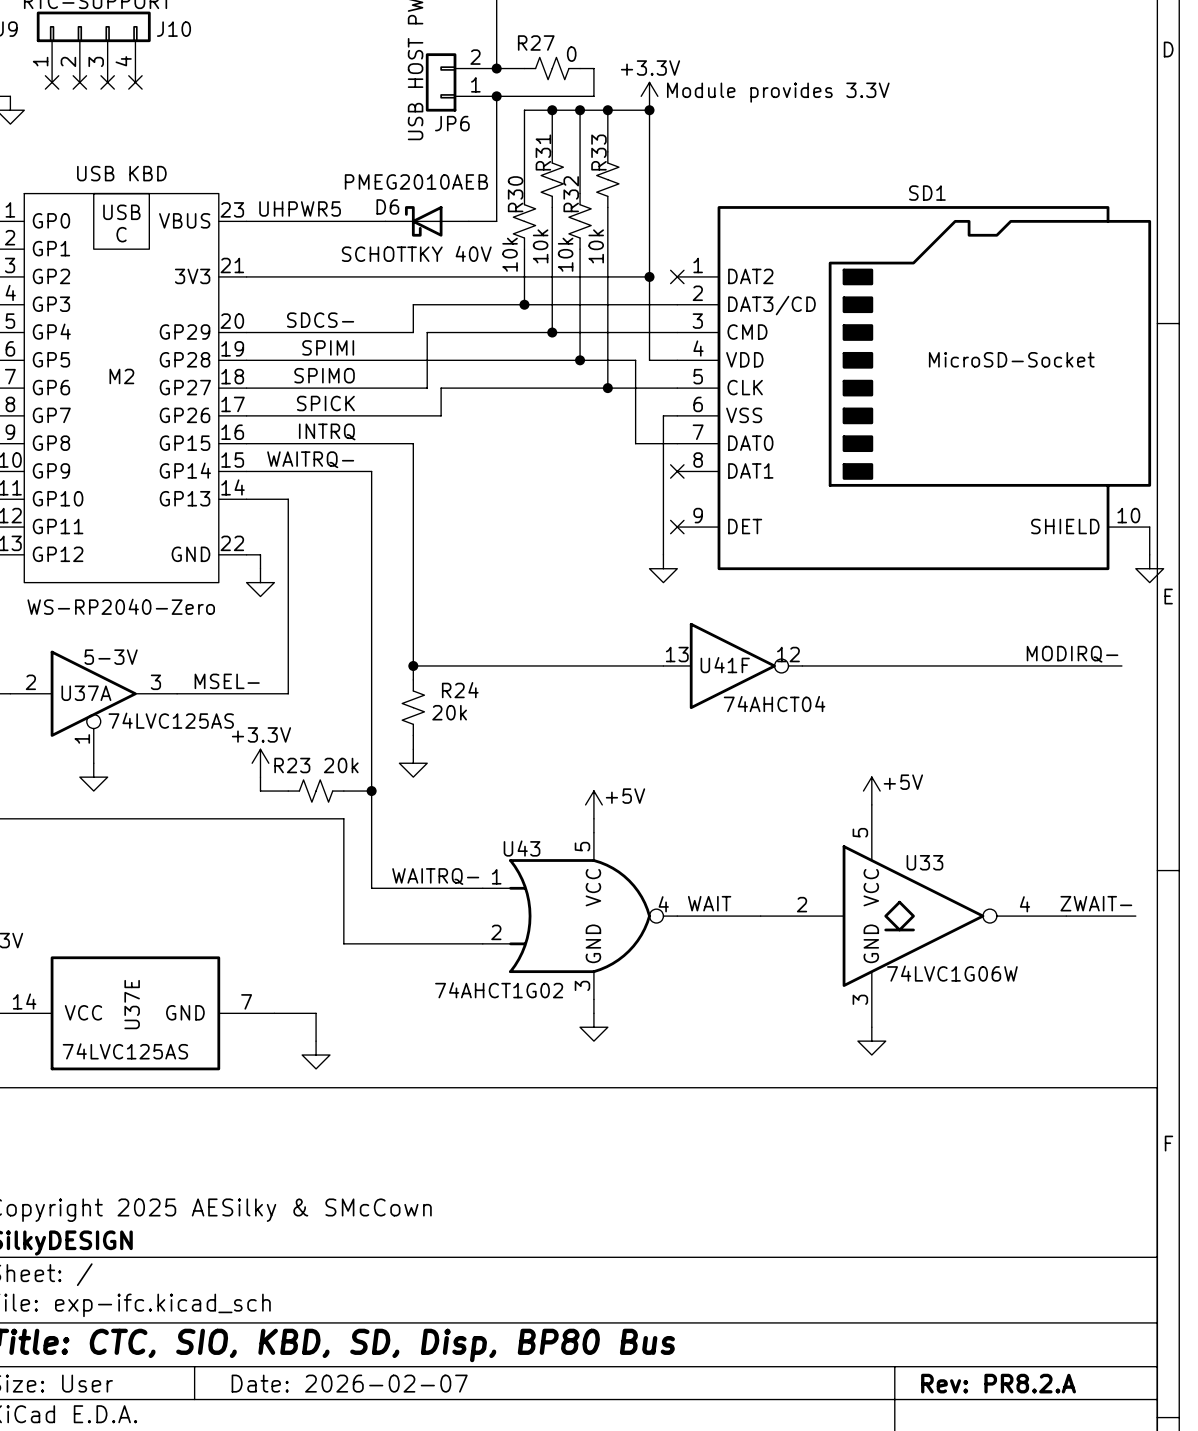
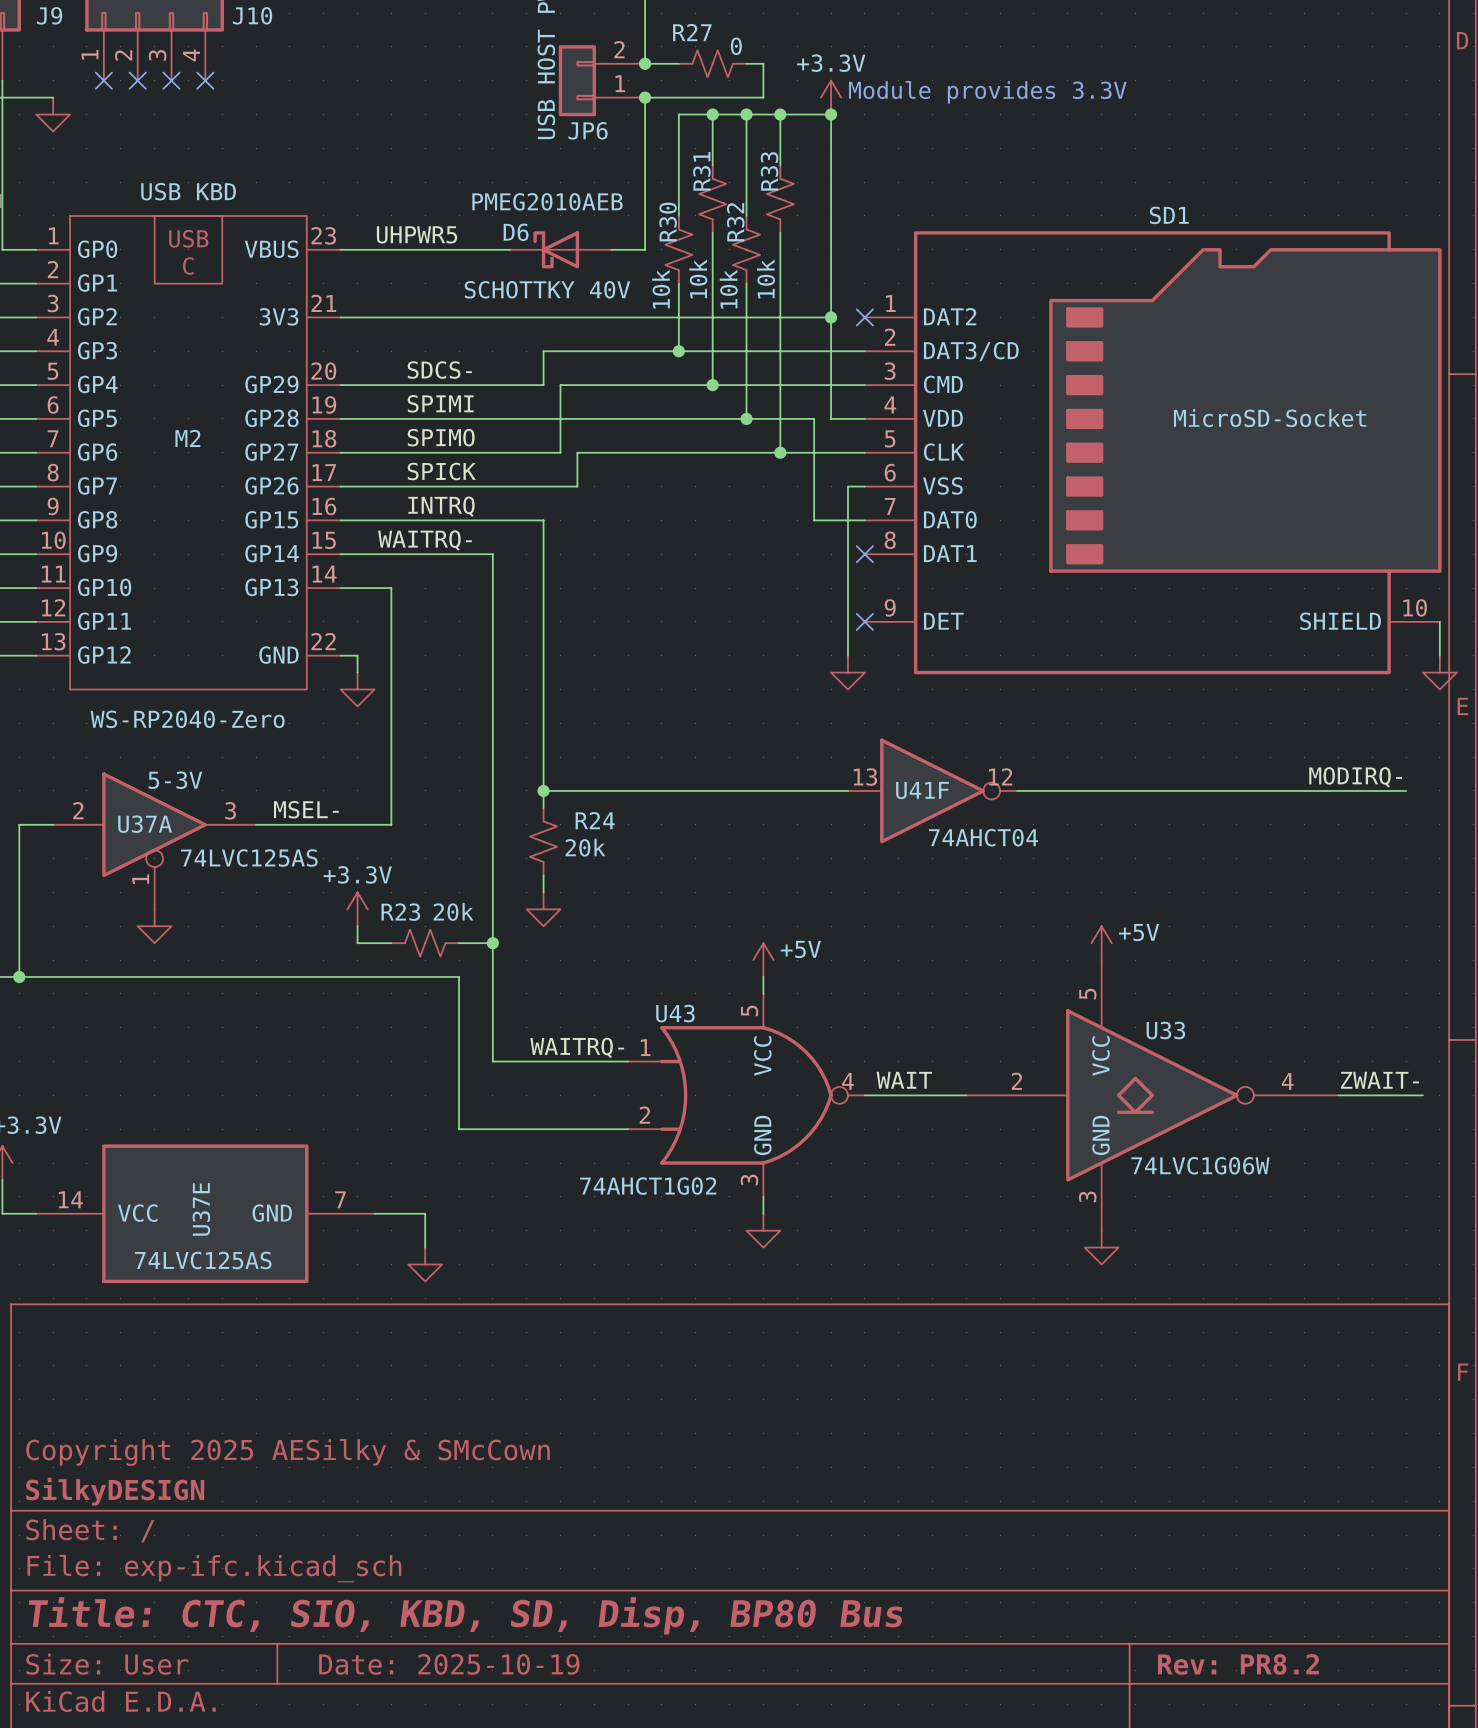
title block: Date: 2026-02-07 (349, 1383) -> Date: 2025-10-19 (449, 1664)
title block: Rev: PR8.2.A (998, 1383) -> Rev: PR8.2 (1238, 1664)

